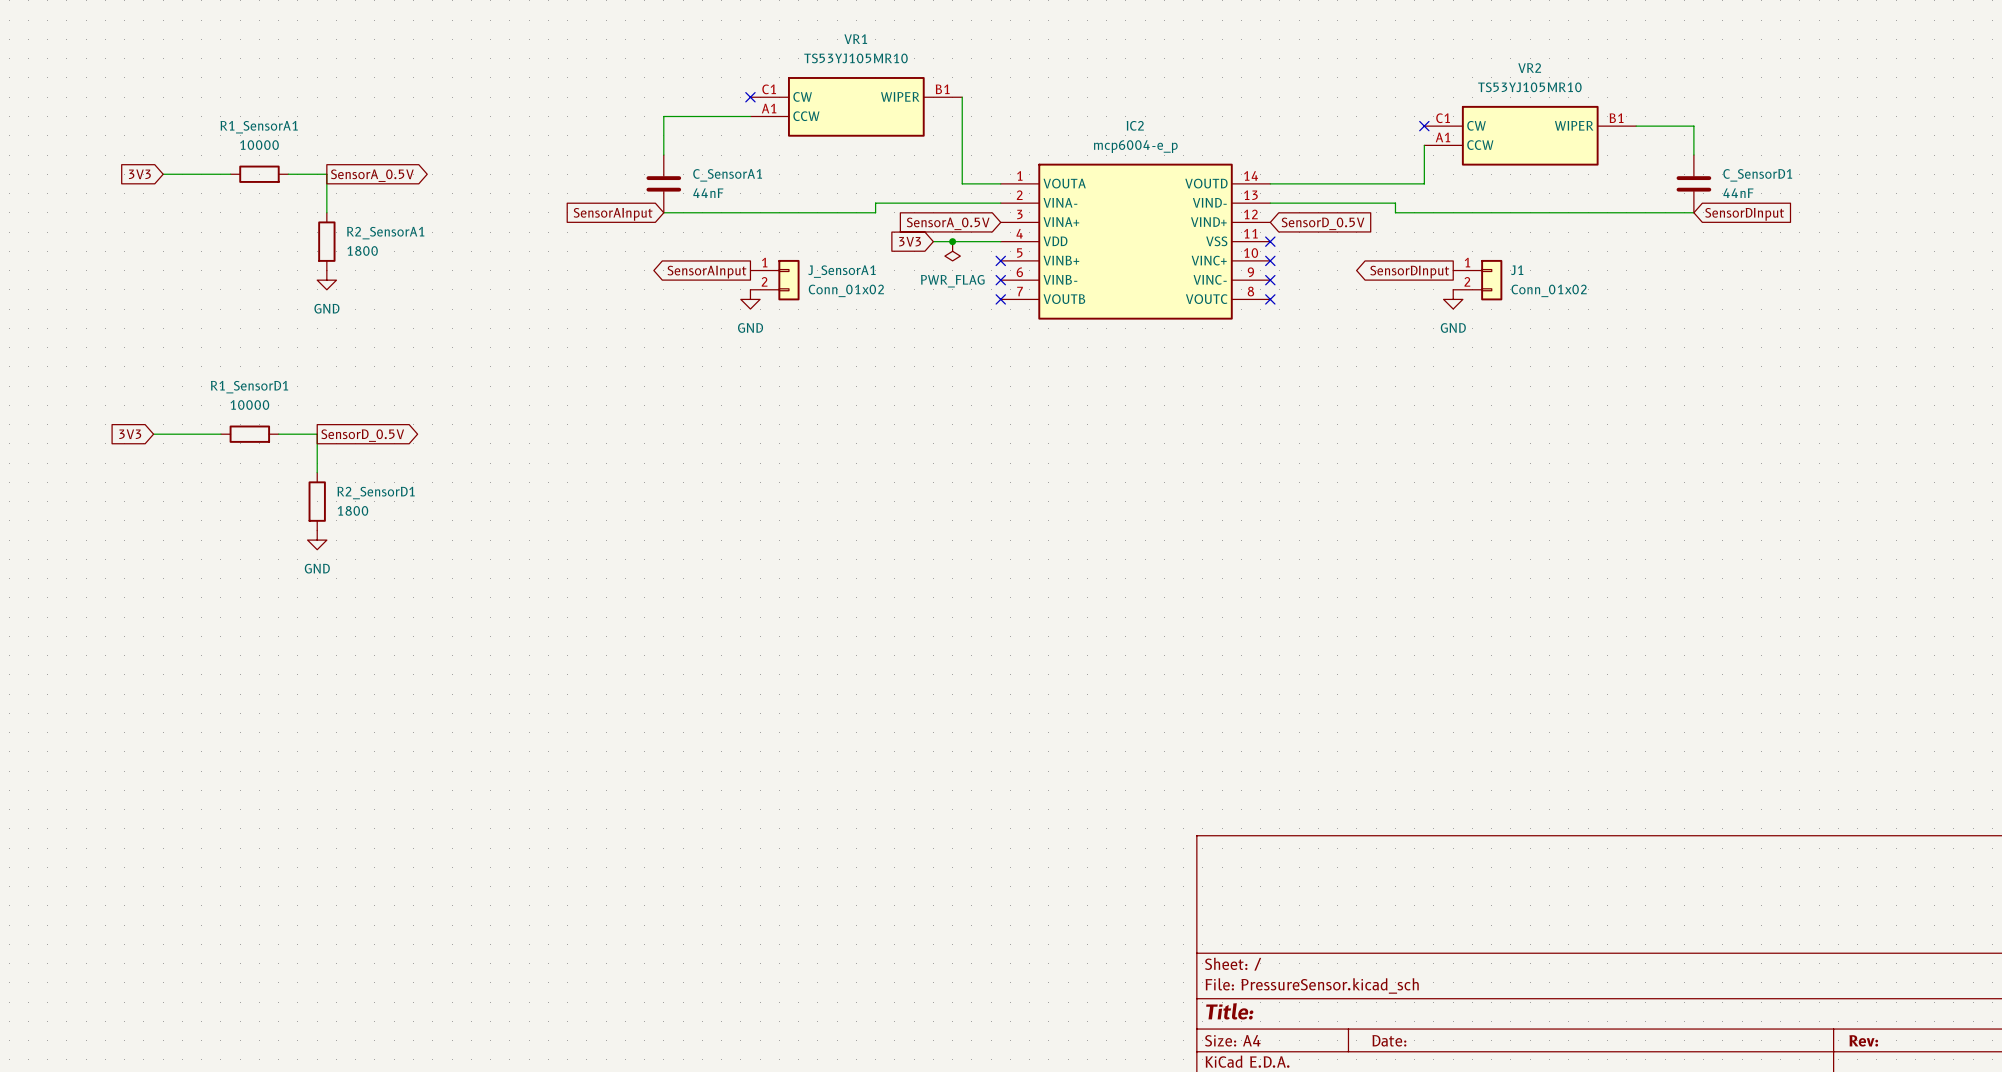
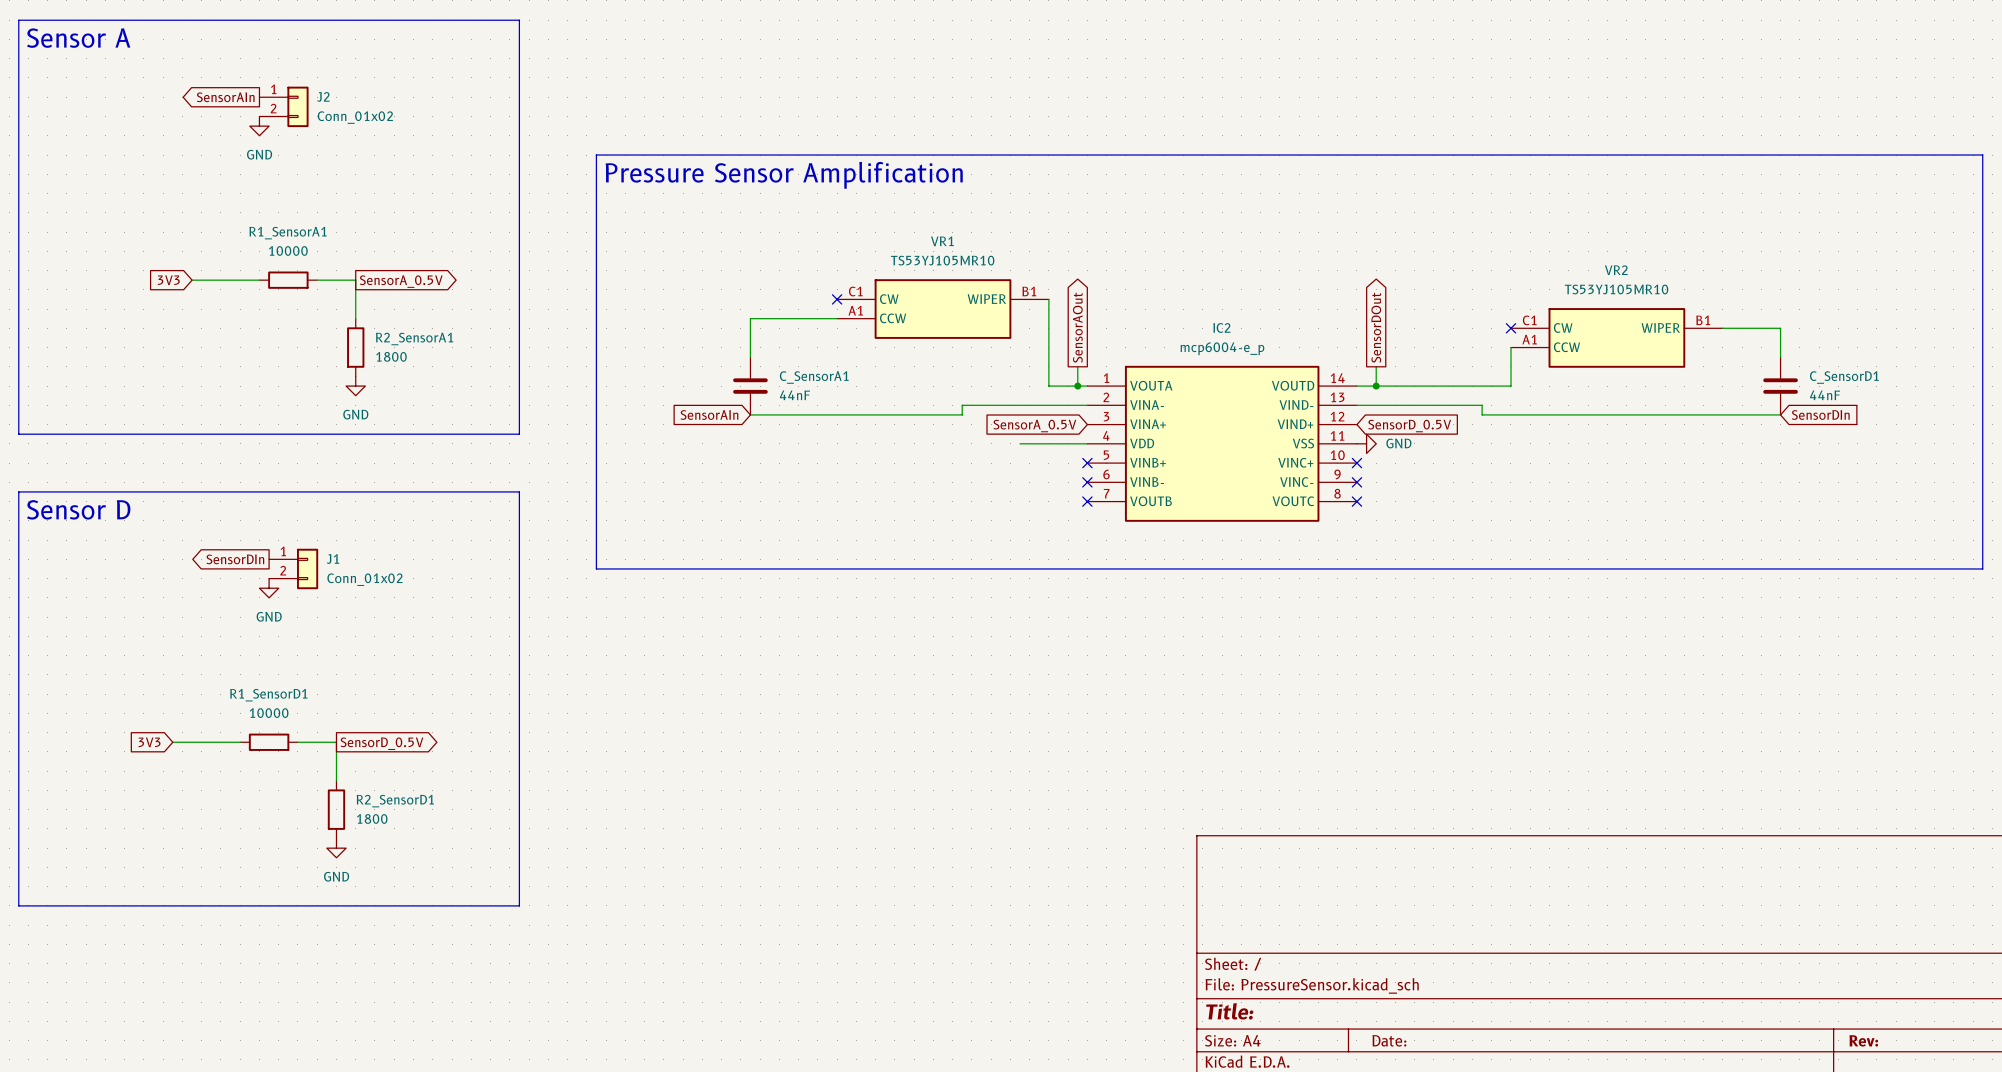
line: none -> (18, 20) (18, 434) (519, 434) (519, 20) (18, 20)
text: none -> Sensor A (78, 38)
global label: none -> SensorAIn (225, 97)
no-connect mark: (750, 97) -> none
wire: (962, 97) (962, 183) (1000, 183) -> none
J2: none -> Conn_01x02 (284, 106)
VR1 position: (856, 106) -> (942, 309)
wire: (750, 116) (663, 116) (663, 155) -> none
power symbol: none -> GND (259, 126)
no-connect mark: (1424, 126) -> none
wire: (1636, 126) (1693, 126) (1693, 155) -> none
VR2 position: (1530, 135) -> (1616, 337)
wire: (1424, 145) (1424, 183) (1270, 183) -> none
line: none -> (596, 155) (1982, 155) (1982, 568) (596, 568) (596, 155)
global label: 3V3 (139, 174) -> none
wire: (163, 174) (230, 174) -> (192, 280) (259, 280)
R1_SensorA1 position: (259, 174) -> (288, 280)
wire: (288, 174) (326, 174) (326, 212) -> (317, 280) (355, 280) (355, 318)
global label position: SensorA_0.5V (372, 175) -> SensorA_0.5V (401, 281)
text: none -> Pressure Sensor Amplification (784, 175)
C_SensorA1 position: (663, 183) -> (750, 386)
C_SensorD1 position: (1693, 183) -> (1780, 386)
wire: (1000, 203) (875, 203) (875, 212) (663, 212) -> none
wire: (1270, 203) (1395, 203) (1395, 212) (1693, 212) -> none
global label: SensorAInput (613, 214) -> none
global label: SensorDInput (1744, 214) -> none
global label: SensorA_0.5V (948, 223) -> none
global label: SensorD_0.5V (1323, 223) -> none
R2_SensorA1 position: (326, 241) -> (355, 347)
global label: 3V3 (910, 241) -> none
wire: (933, 241) (1000, 241) -> none
junction: (952, 241) -> none
IC2 position: (1135, 241) -> (1222, 443)
no-connect mark: (1270, 241) -> none
power symbol: PWR_FLAG (952, 251) -> none
no-connect mark: (1000, 260) -> none
no-connect mark: (1270, 260) -> none
global label: SensorAInput (706, 272) -> none
global label: SensorDInput (1409, 272) -> SensorDOut (1376, 327)
global label: none -> 3V3 (168, 280)
power symbol: GND (326, 280) -> none
J_SensorA1: Conn_01x02 (774, 280) -> none
no-connect mark: (1000, 280) -> none
no-connect mark: (1270, 280) -> none
J1 position: (1477, 280) -> (293, 568)
power symbol: GND (750, 299) -> none
no-connect mark: none -> (837, 299)
no-connect mark: (1000, 299) -> none
wire: none -> (1048, 299) (1048, 386) (1087, 386)
no-connect mark: (1270, 299) -> none
power symbol rotation: 0° (1453, 299) -> 90° counterclockwise (1366, 443)
power symbol position: GND (1453, 299) -> GND (1366, 443)
wire: none -> (837, 318) (750, 318) (750, 357)
global label: none -> SensorAOut (1077, 327)
no-connect mark: none -> (1510, 328)
wire: none -> (1722, 328) (1780, 328) (1780, 357)
wire: none -> (1510, 347) (1510, 386) (1356, 386)
wire: none -> (1077, 366) (1077, 386)
wire: none -> (1376, 366) (1376, 386)
power symbol: none -> GND (355, 386)
junction: none -> (1077, 386)
junction: none -> (1376, 386)
wire: none -> (1087, 405) (962, 405) (962, 414) (750, 414)
wire: none -> (1356, 405) (1482, 405) (1482, 414) (1780, 414)
global label: none -> SensorAIn (709, 414)
global label: none -> SensorDIn (1820, 414)
global label: none -> SensorA_0.5V (1034, 426)
global label: none -> SensorD_0.5V (1409, 426)
global label: 3V3 (130, 434) -> none
R1_SensorD1 position: (249, 434) -> (269, 742)
wire: (278, 434) (317, 434) (317, 472) -> none
global label: SensorD_0.5V (362, 435) -> none
wire: none -> (1020, 443) (1087, 443)
no-connect mark: none -> (1087, 463)
no-connect mark: none -> (1356, 463)
no-connect mark: none -> (1087, 482)
no-connect mark: none -> (1356, 482)
line: none -> (18, 491) (519, 491) (519, 905) (18, 905) (18, 491)
R2_SensorD1 position: (317, 501) -> (336, 809)
no-connect mark: none -> (1087, 501)
no-connect mark: none -> (1356, 501)
text: none -> Sensor D (78, 509)
power symbol position: GND (317, 540) -> GND (269, 588)
global label: none -> SensorDIn (235, 559)
global label: none -> 3V3 (149, 742)
wire: none -> (172, 742) (240, 742)
wire: none -> (297, 742) (336, 742) (336, 780)
global label: none -> SensorD_0.5V (381, 743)
power symbol: none -> GND (336, 848)

